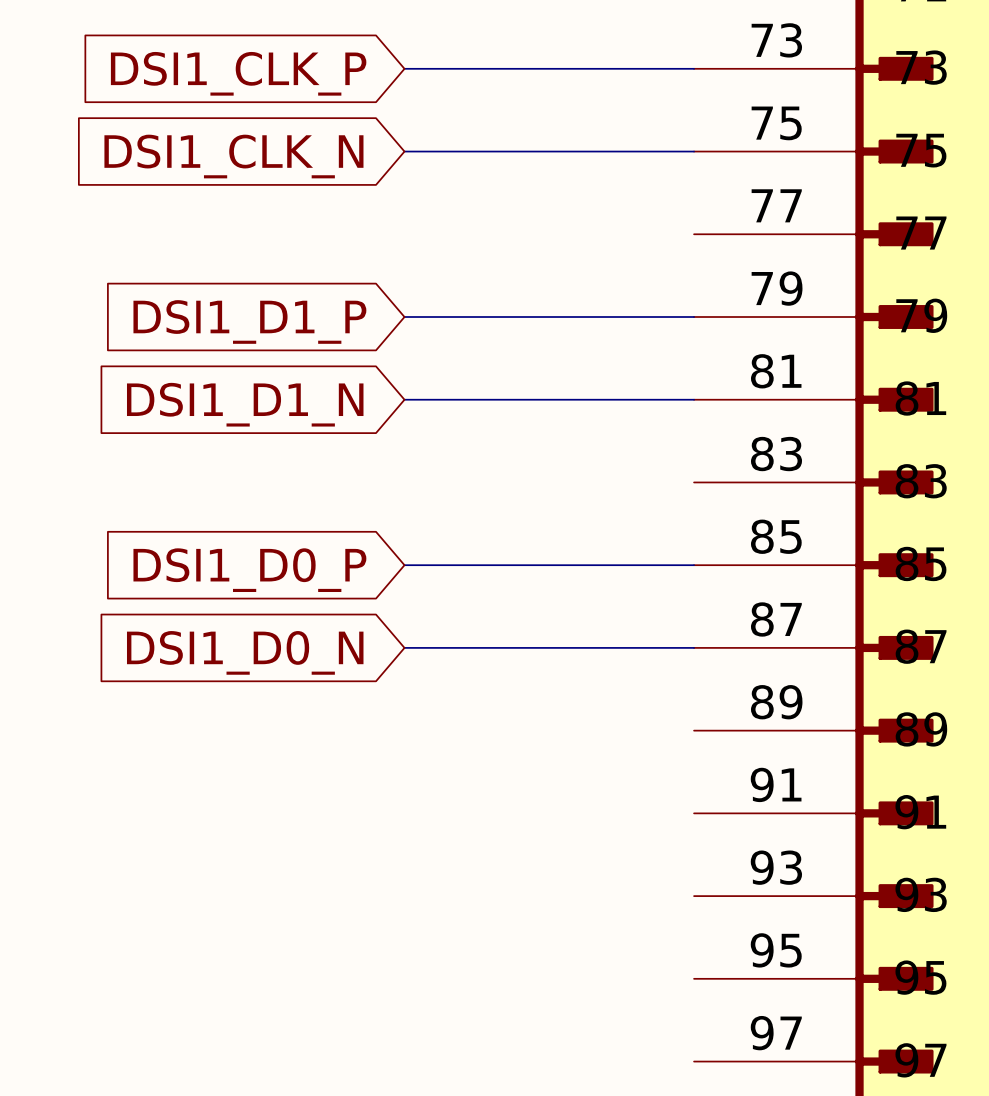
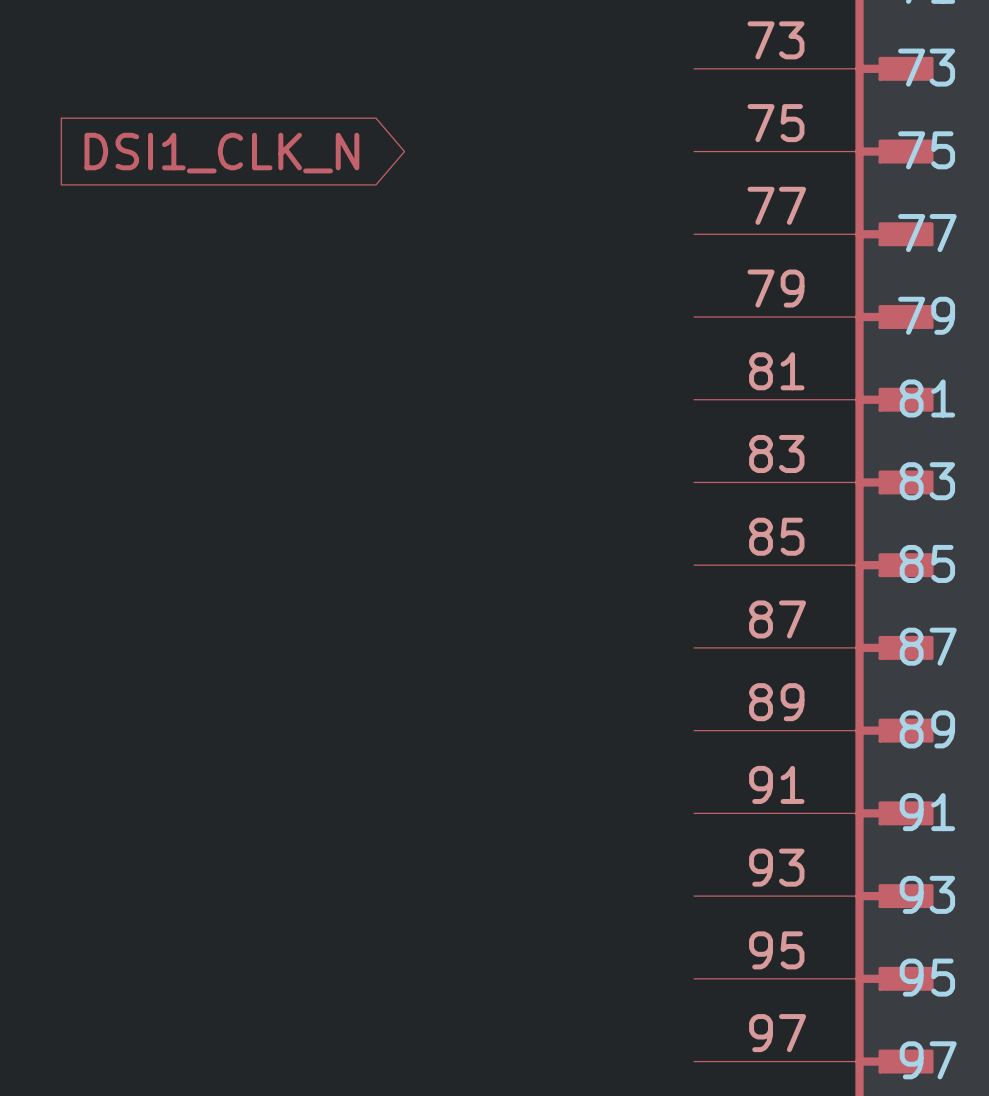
wire: (404, 68) (694, 68) -> none
global label: DSI1_CLK_P (238, 73) -> none
wire: (404, 151) (694, 151) -> none
wire: (404, 317) (694, 317) -> none
global label: DSI1_D1_P (249, 321) -> none
wire: (404, 399) (694, 399) -> none
global label: DSI1_D1_N (245, 404) -> none
wire: (404, 565) (694, 565) -> none
global label: DSI1_D0_P (249, 570) -> none
wire: (404, 647) (694, 647) -> none
global label: DSI1_D0_N (245, 652) -> none

